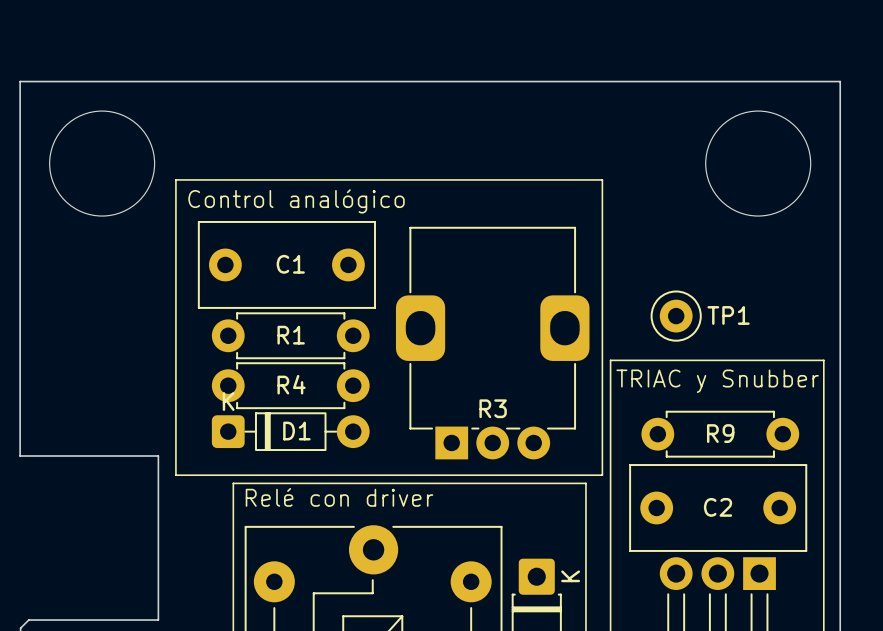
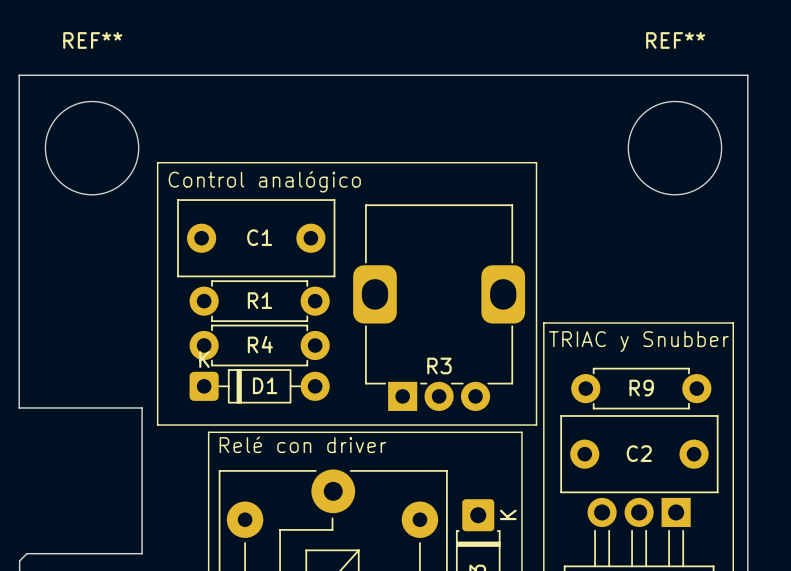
REF** name: none -> REF** (92, 40)
REF** name: none -> REF** (675, 40)
TP1: (676, 316) -> none

